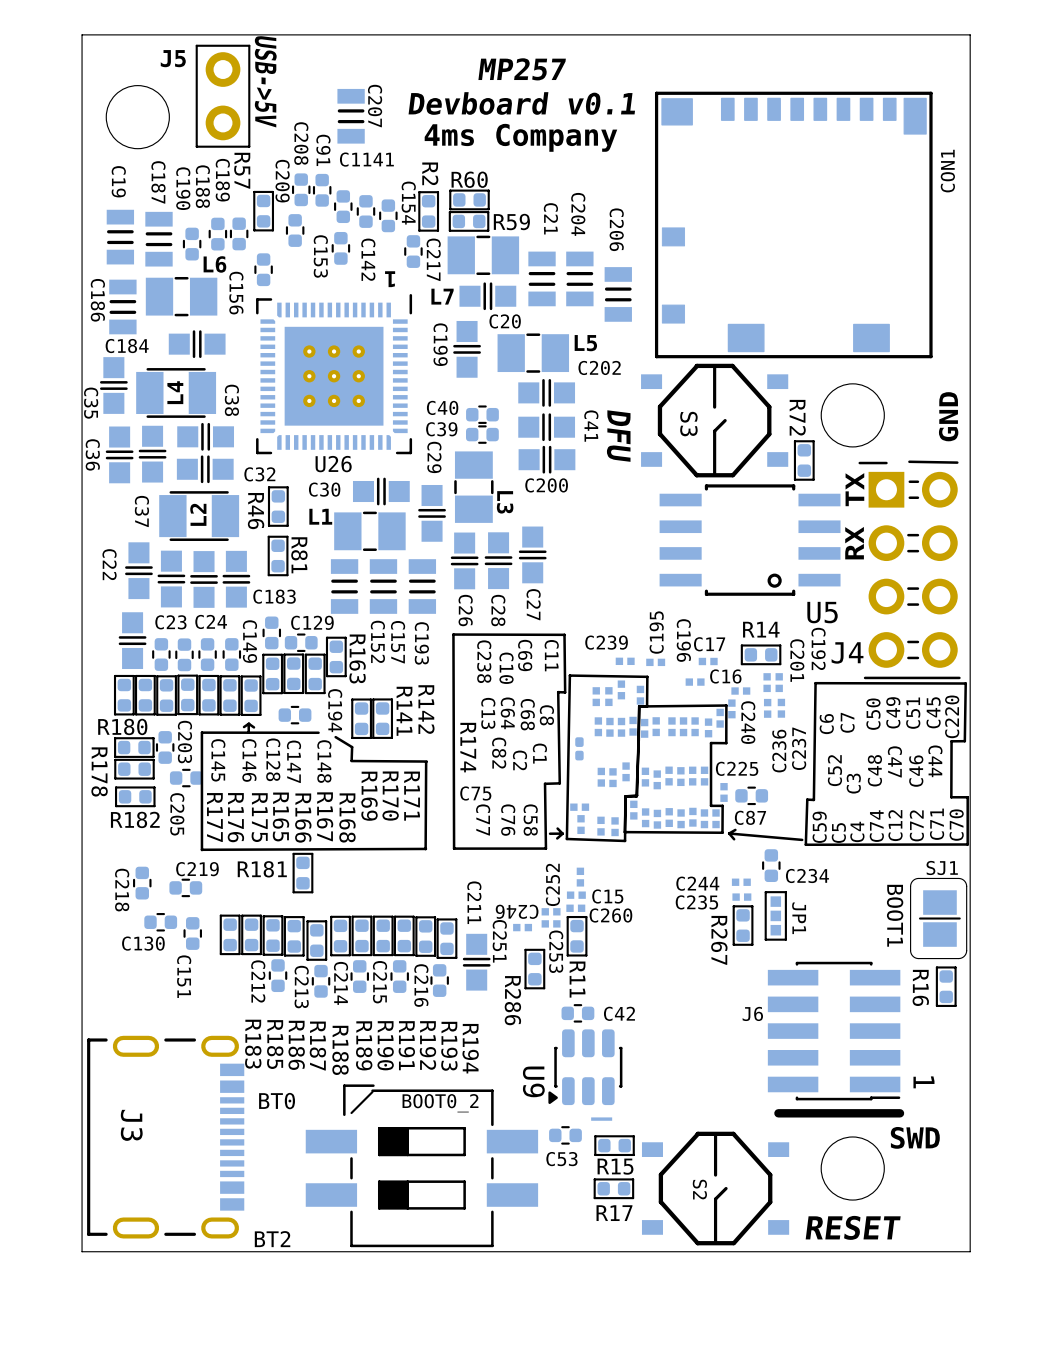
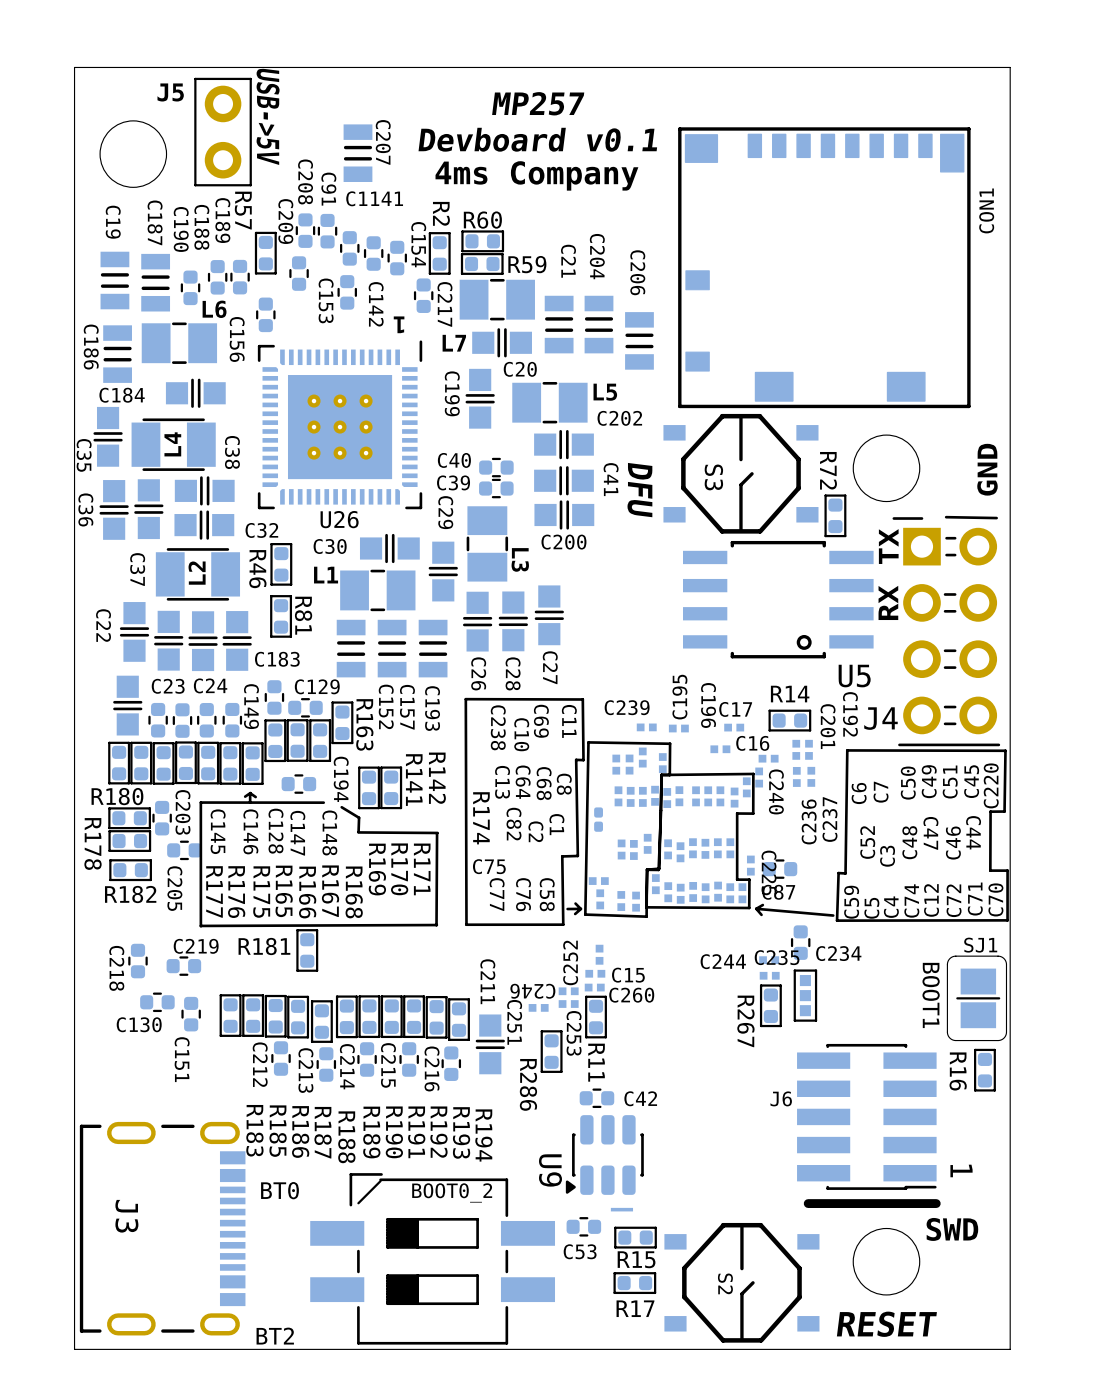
C225 name rotation: 0° (737, 768) -> 90° clockwise (769, 872)
C235 name position: C235 (696, 902) -> C235 (777, 957)
JP1 name: JP1 (799, 918) -> none

